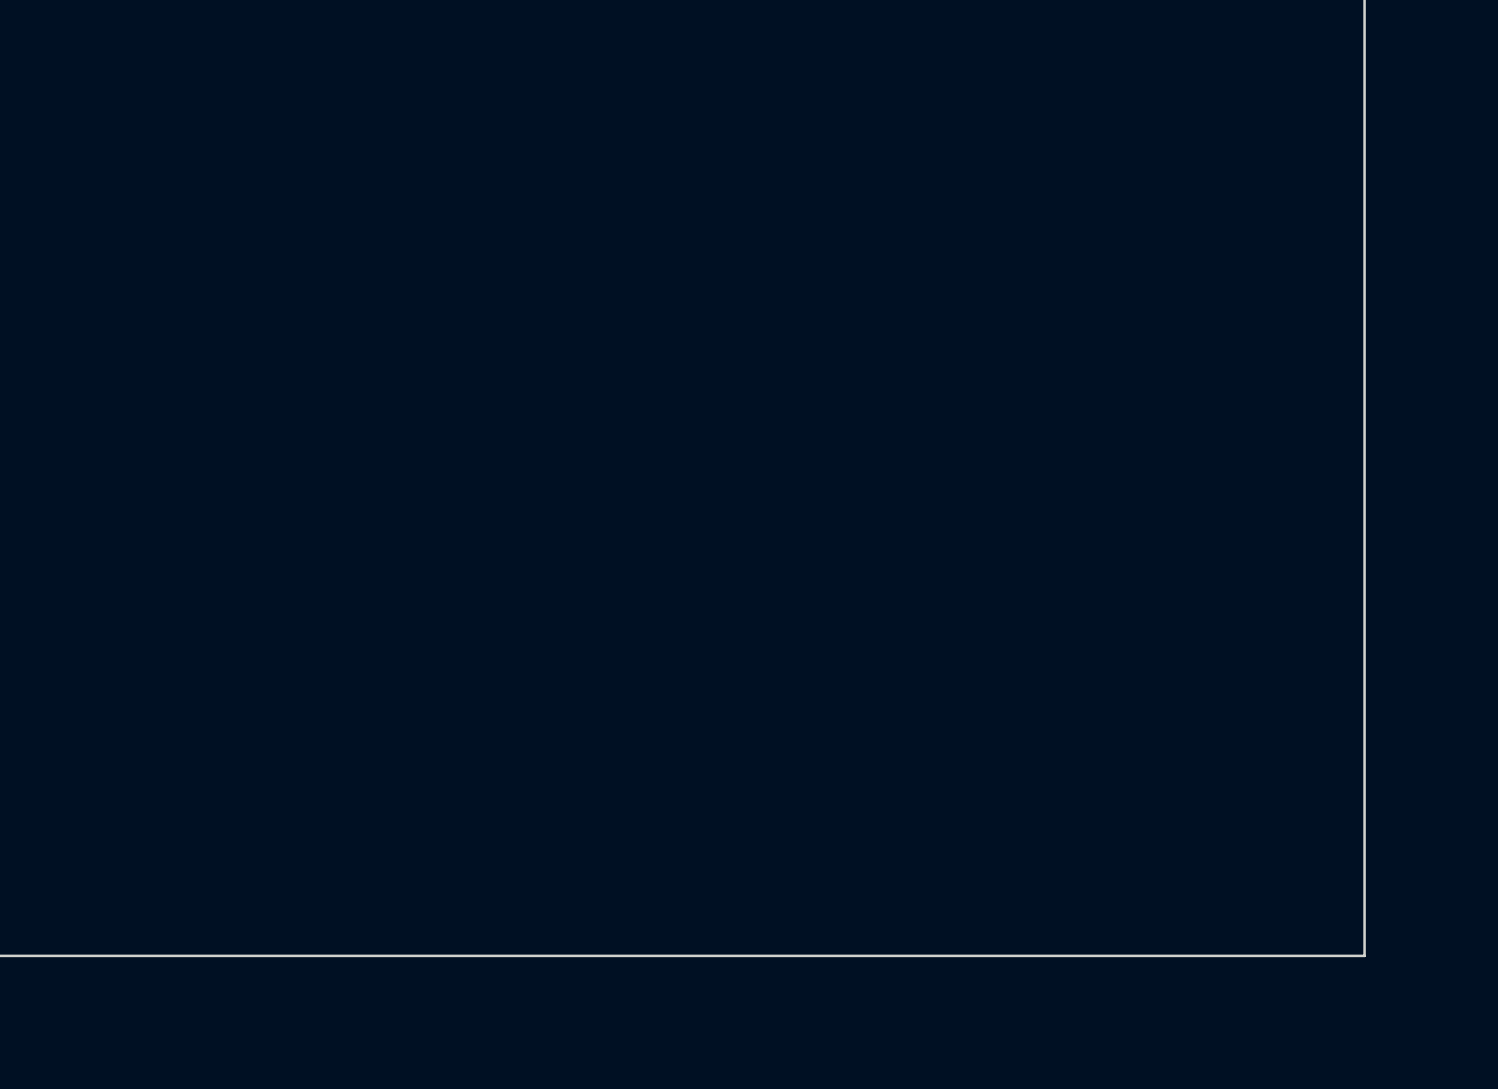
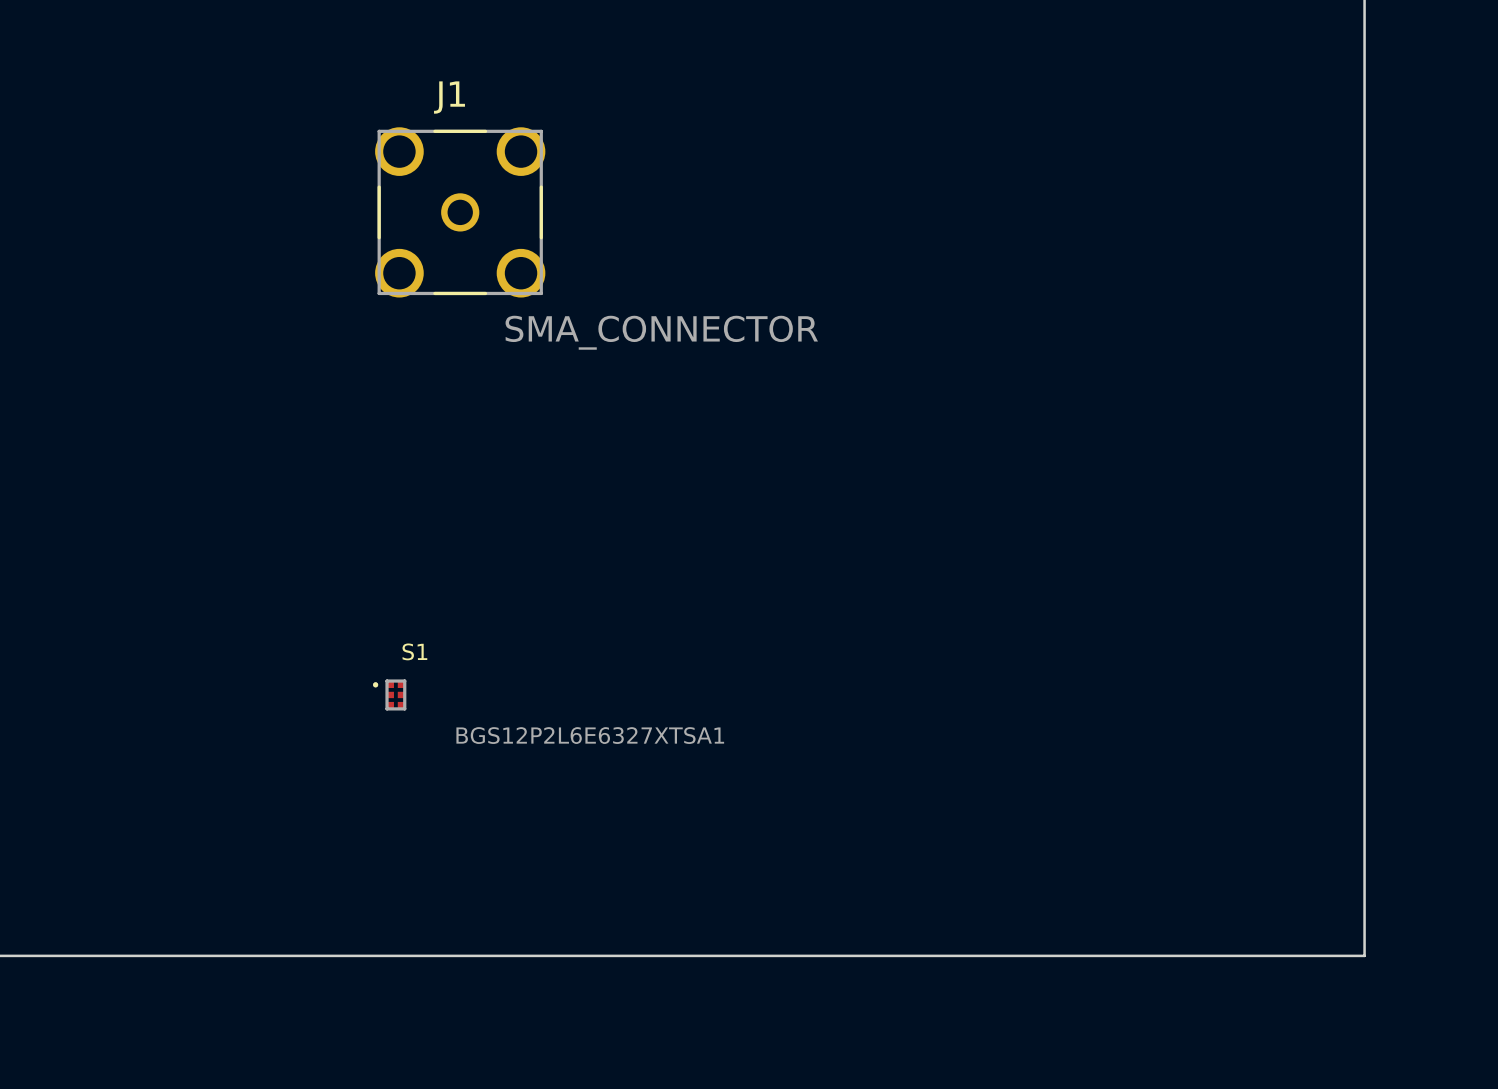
J1: none -> SMA_CONNECTOR (460, 212)
S1: none -> BGS12P2L6E6327XTSA1 (389, 694)

